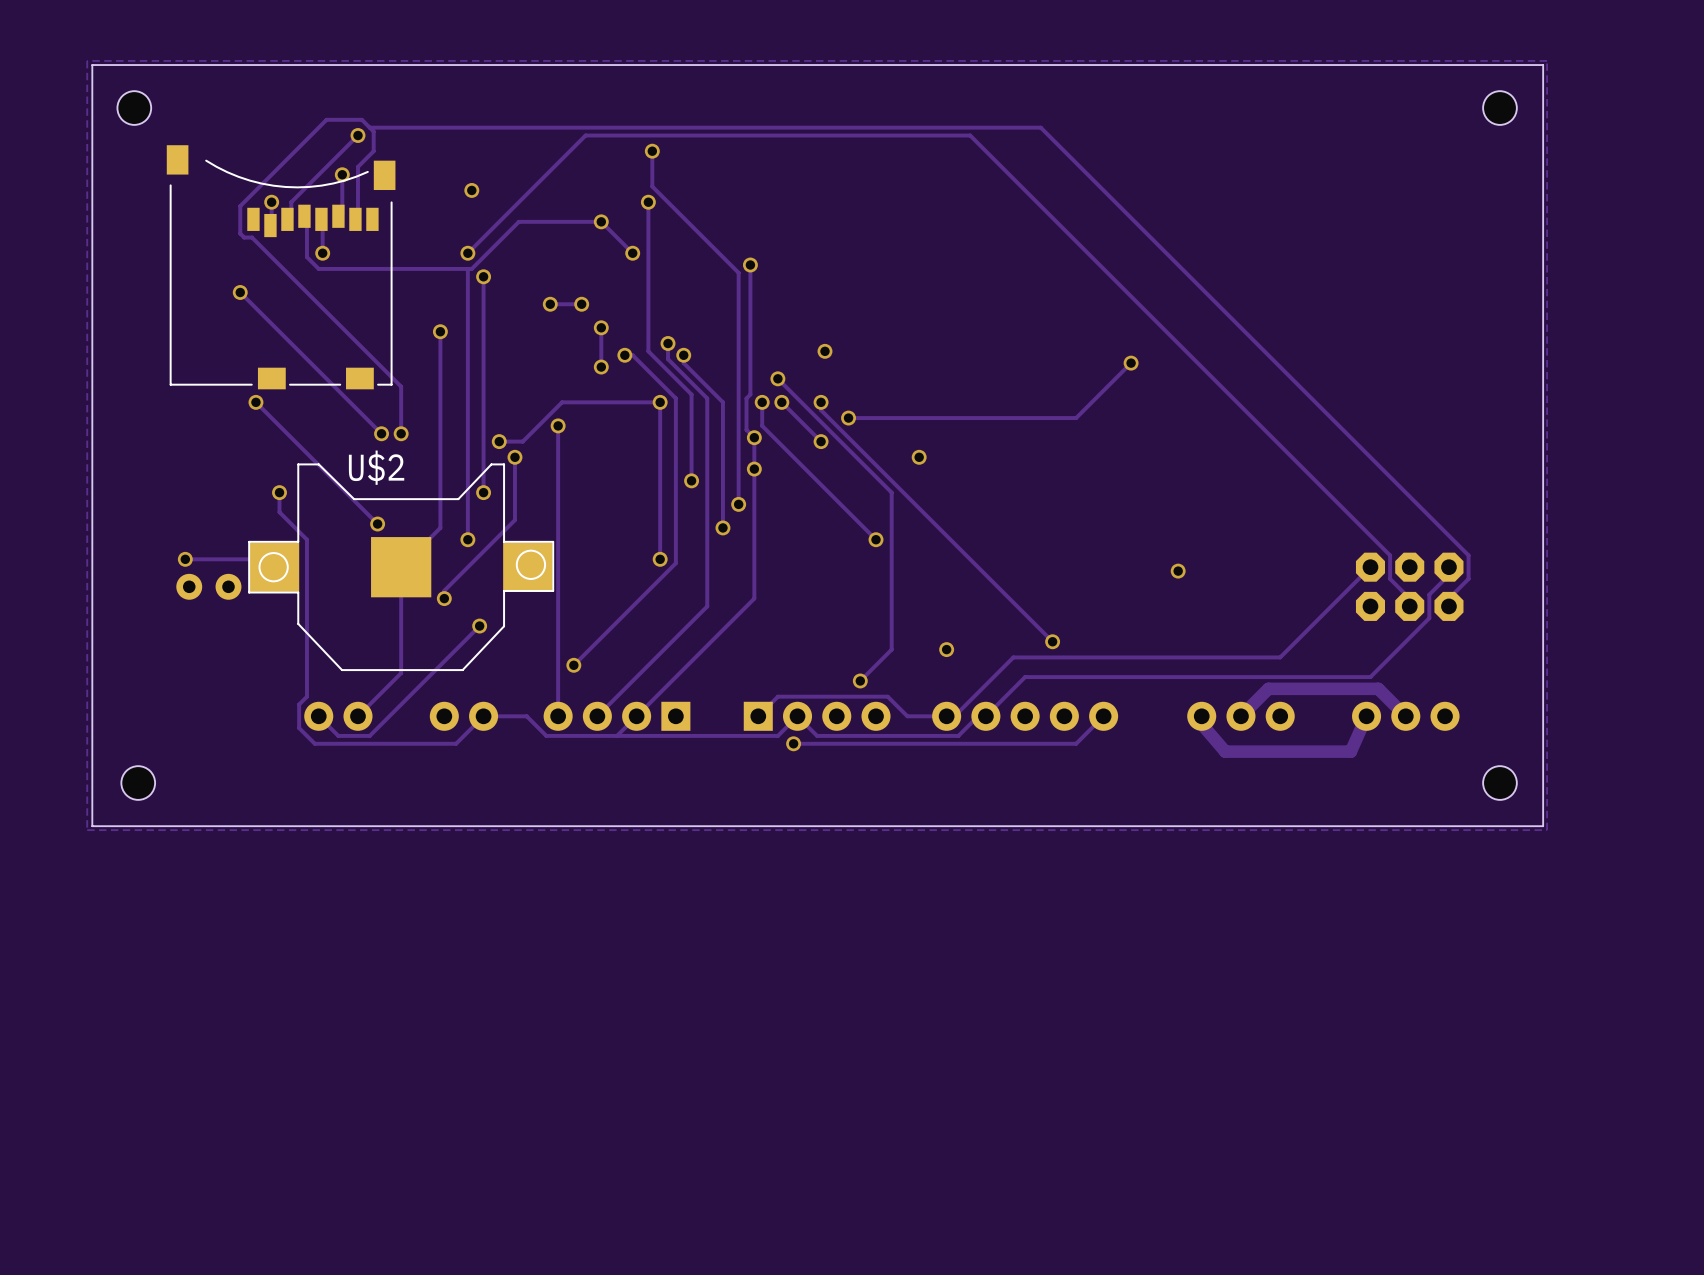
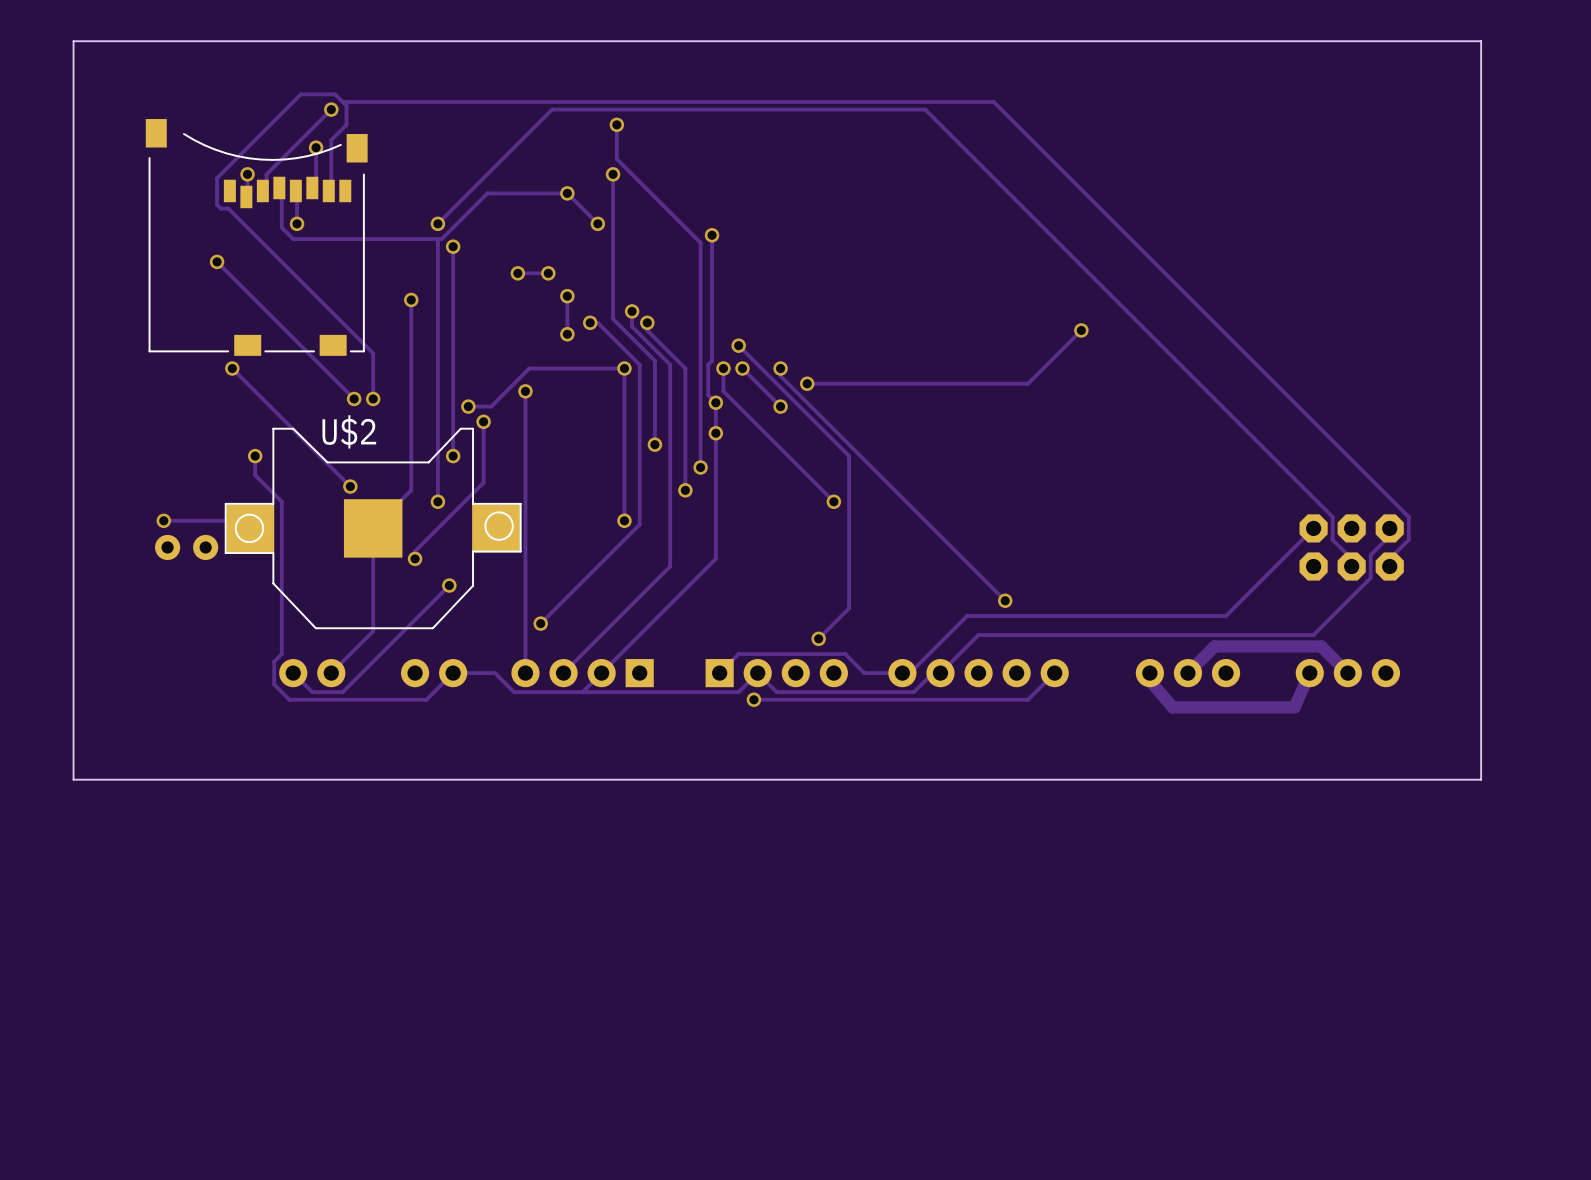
zone outline: (1547, 60) (87, 60) (87, 830) (1547, 830) (1547, 60) -> none
hole: (134, 108) -> none
hole: (1499, 108) -> none
via: (471, 190) -> none
via: (824, 351) -> none
via: (919, 457) -> none
via: (1178, 571) -> none
via: (946, 649) -> none
hole: (138, 783) -> none
hole: (1499, 783) -> none

